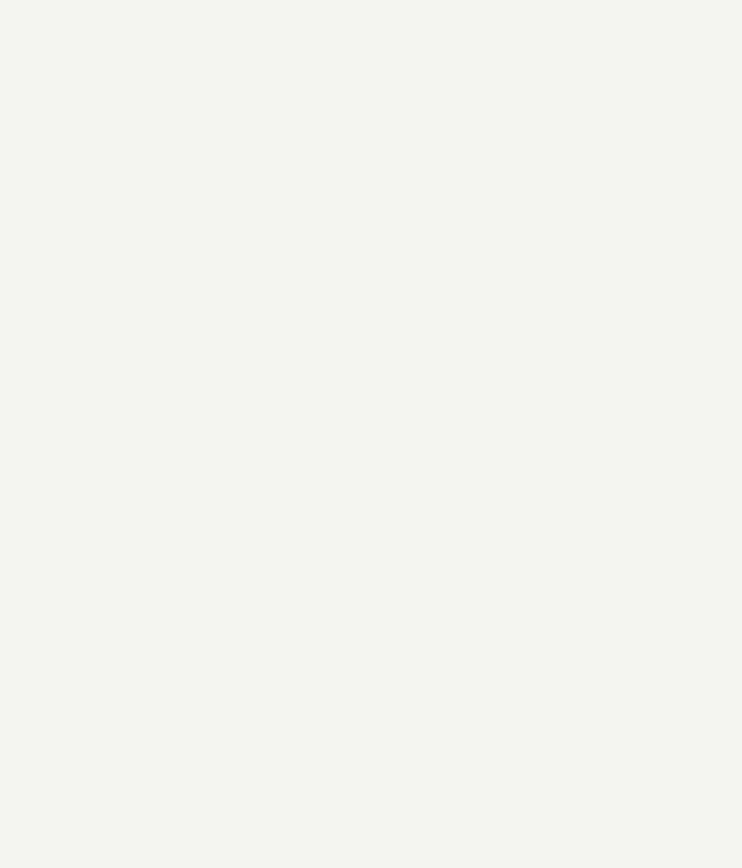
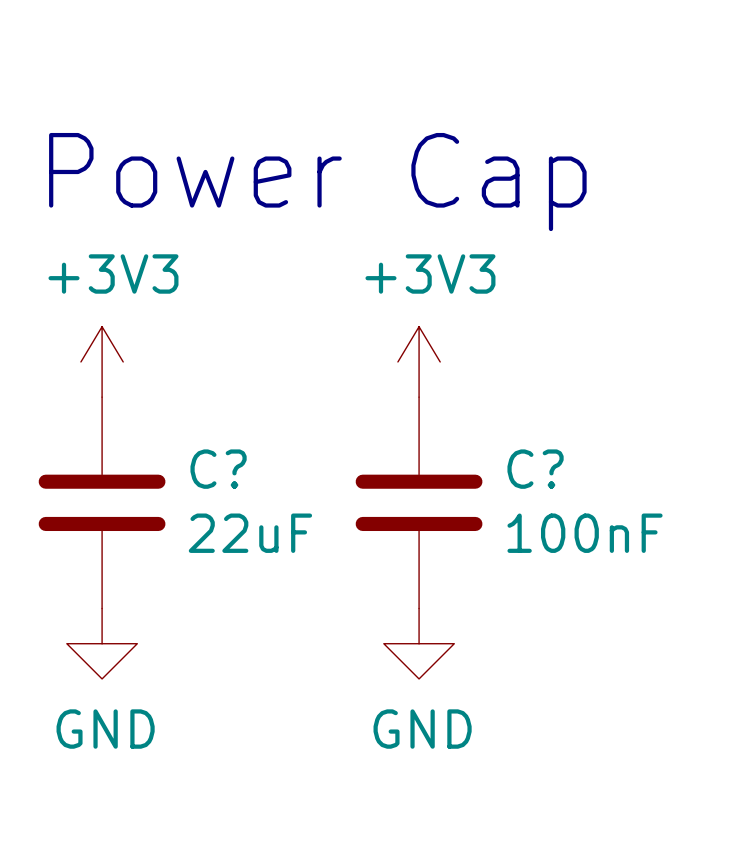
text: none -> Power Cap (317, 182)
power symbol: none -> +3V3 (102, 361)
power symbol: none -> +3V3 (419, 361)
C?: none -> 22uF (102, 502)
C?: none -> 100nF (419, 502)
power symbol: none -> GND (102, 643)
power symbol: none -> GND (419, 643)

